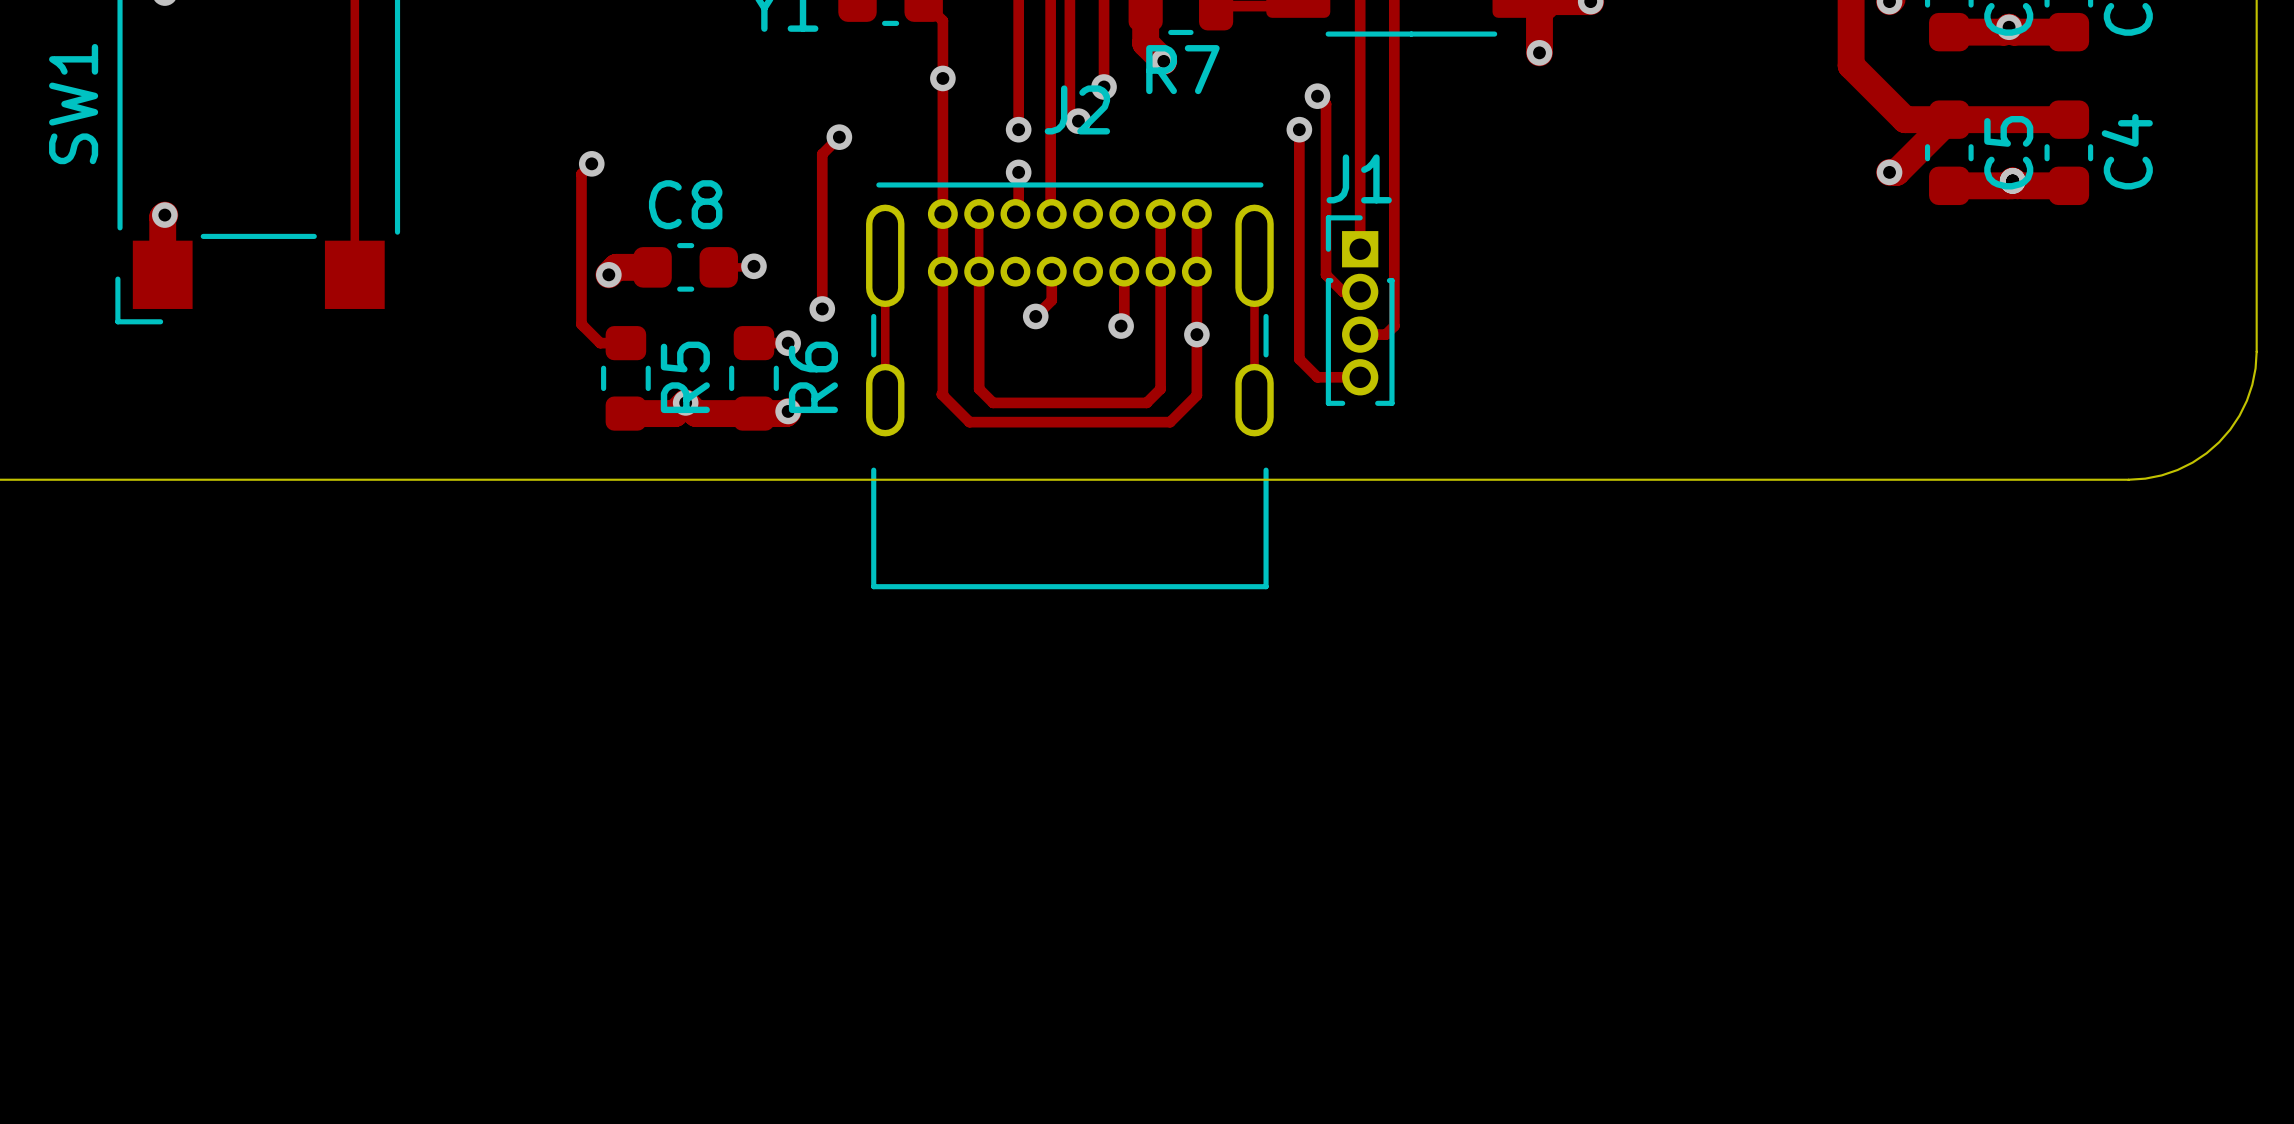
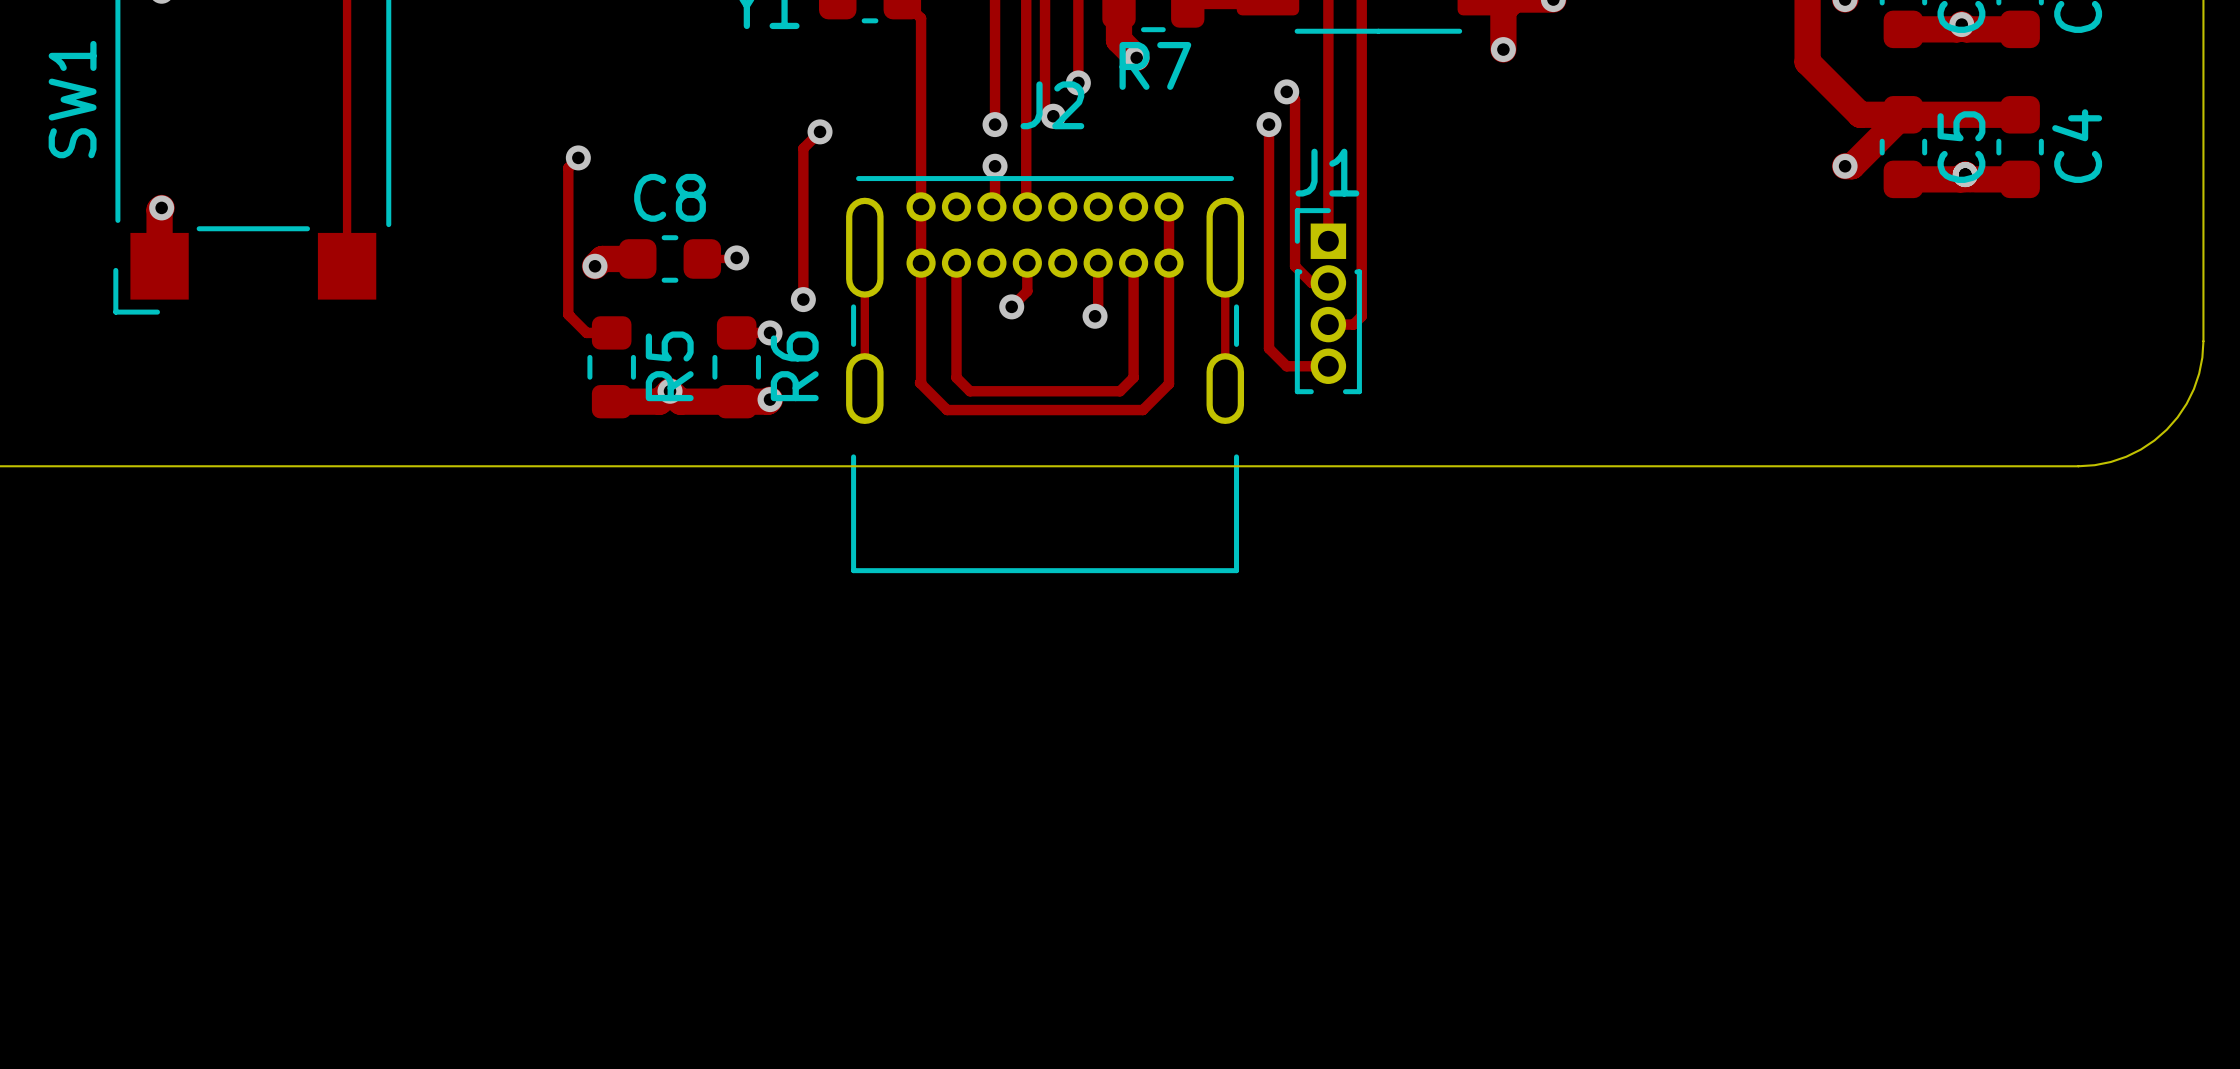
via: (942, 78) -> none
track: (979, 214) (979, 271) -> none
track: (1160, 214) (1160, 271) -> none
via: (1196, 334) -> none

